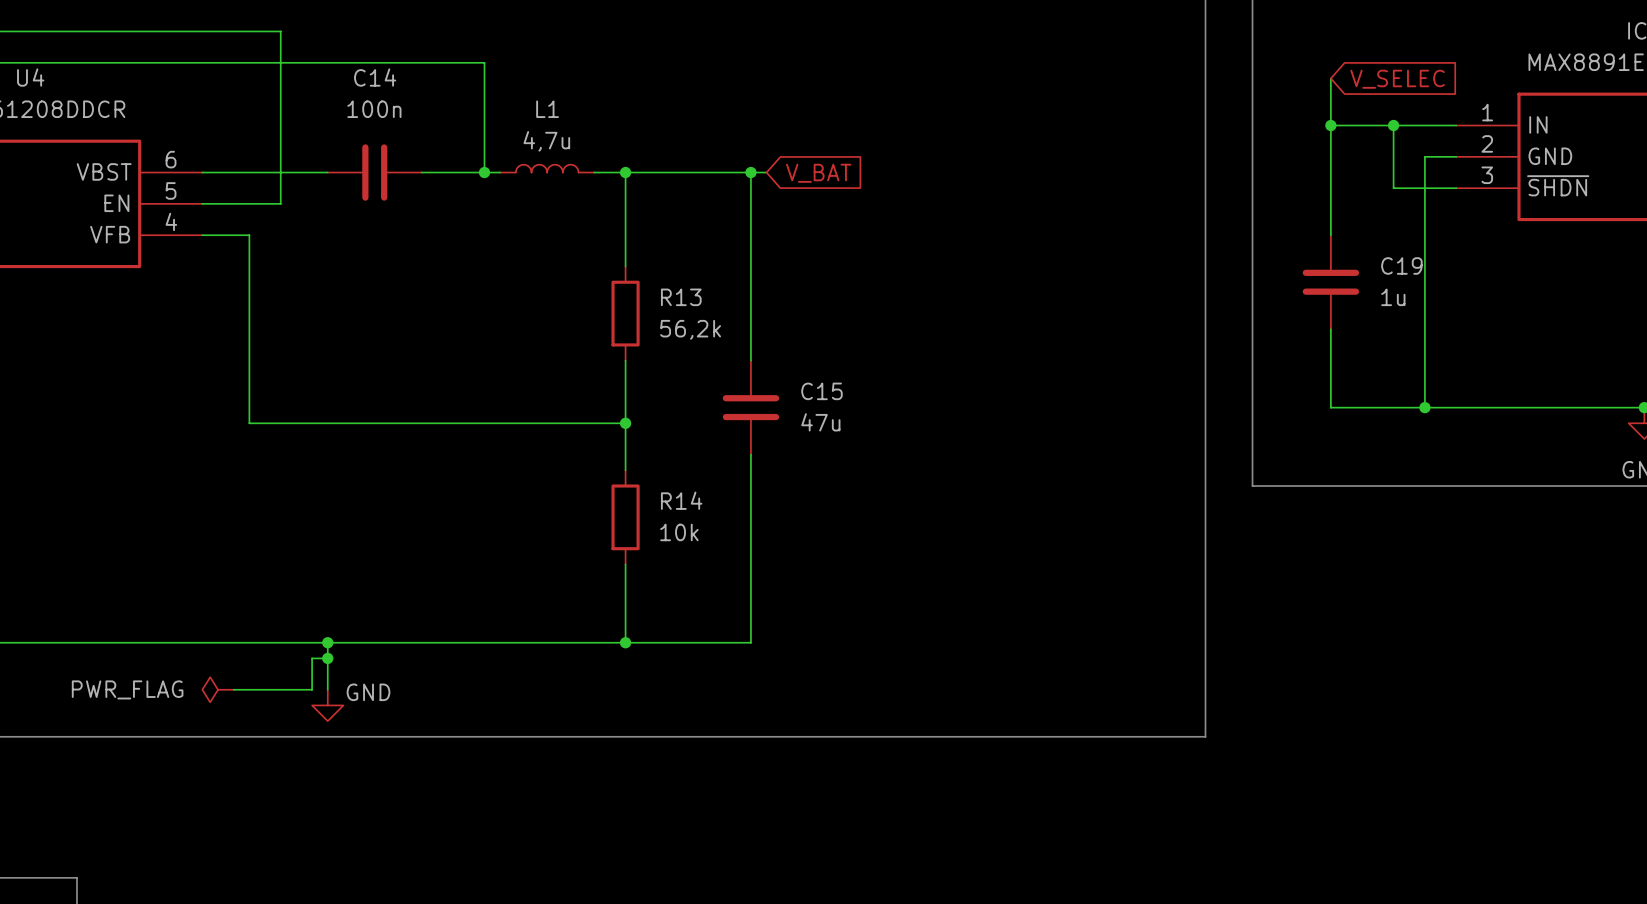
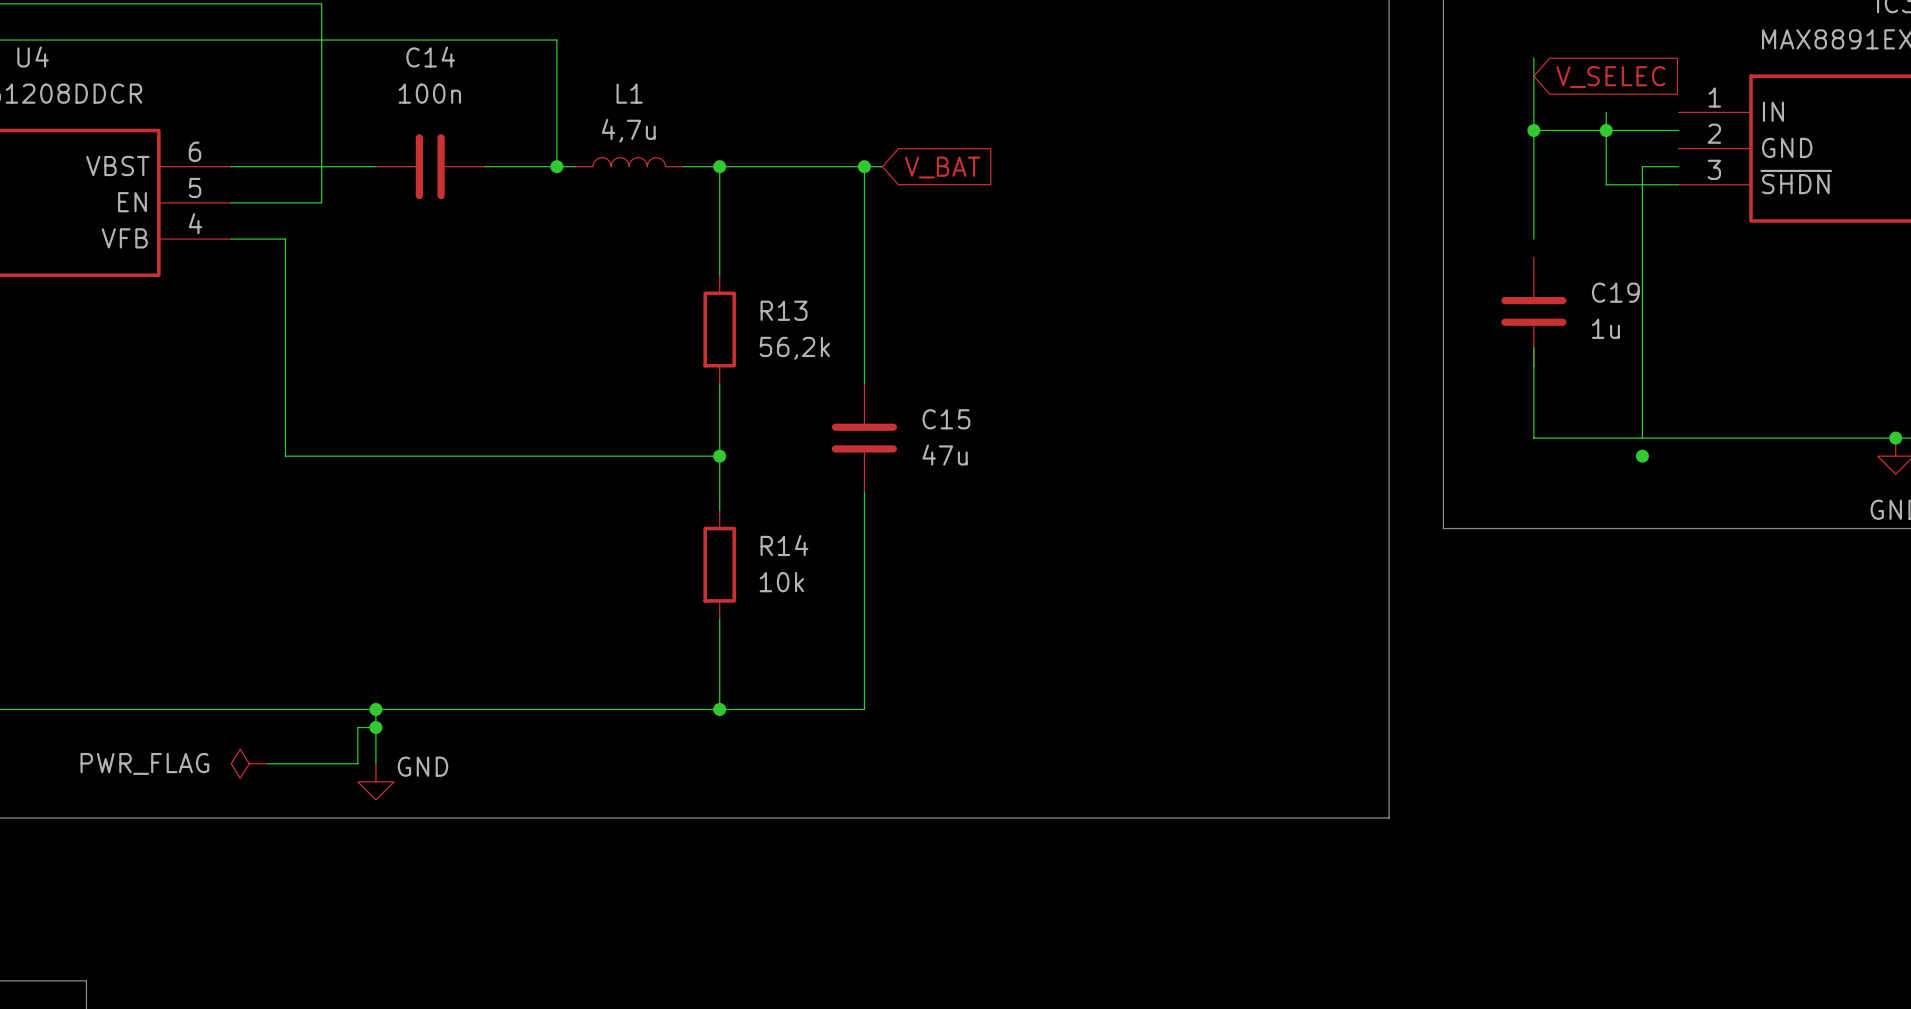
global label position: V_SELEC (1397, 79) -> V_SELEC (1610, 77)
wire: (1330, 125) (1456, 125) -> (1533, 130) (1678, 130)
junction position: (1330, 125) -> (1533, 130)
junction position: (1393, 125) -> (1606, 130)
wire: (1456, 156) (1424, 156) (1424, 172) -> (1678, 166) (1642, 166)
C19 position: (1330, 282) -> (1533, 311)
junction position: (1424, 407) -> (1642, 456)

